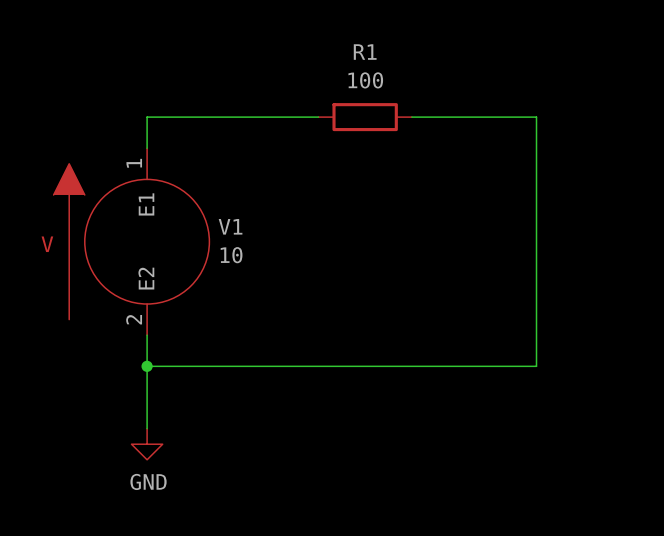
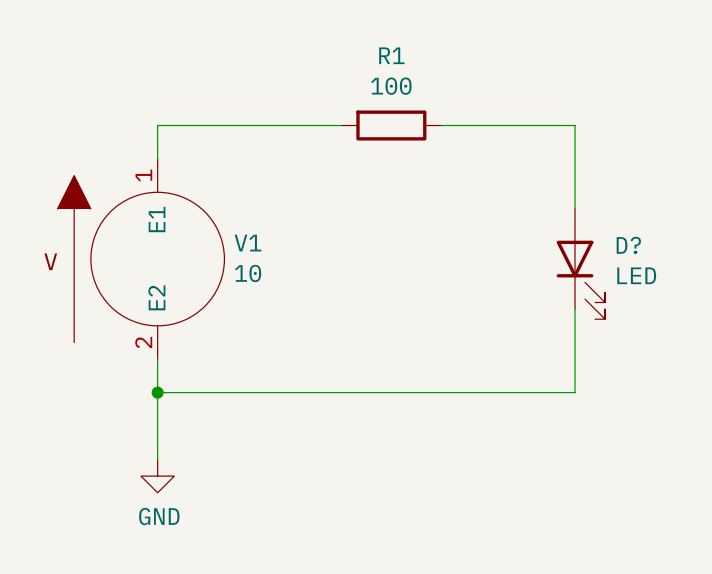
D?: none -> LED (580, 264)

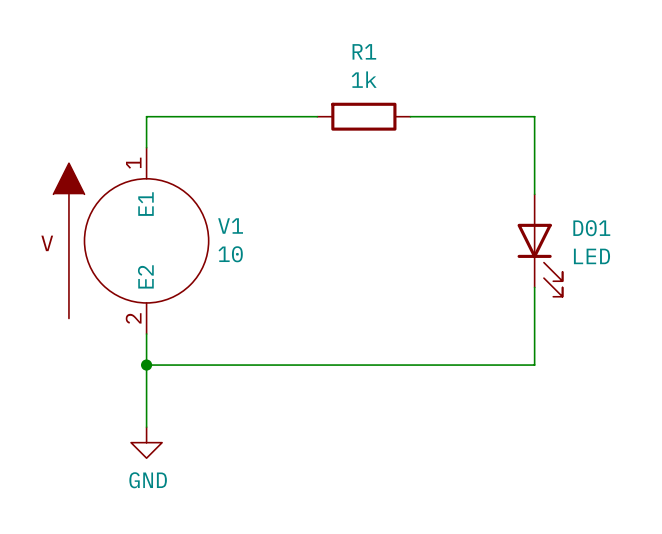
R1 value: 100 (391, 86) -> 1k (364, 79)
D? name: D? (628, 245) -> D01 (591, 228)

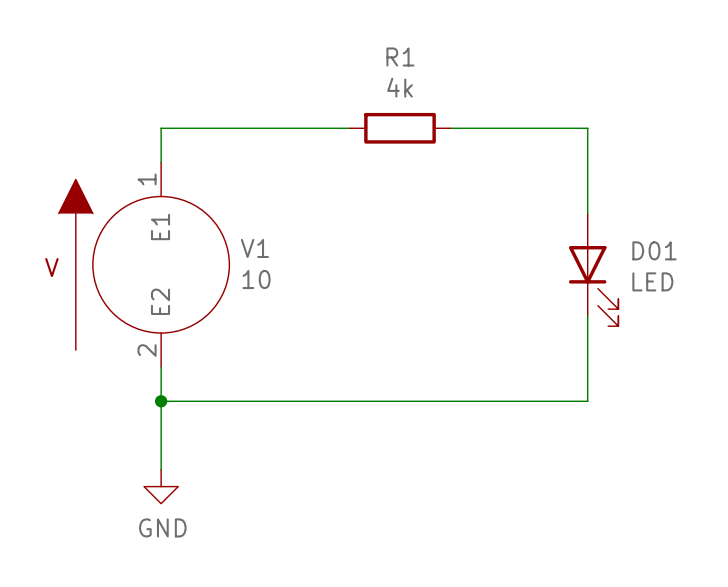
R1 value: 1k (364, 79) -> 4k (400, 87)

